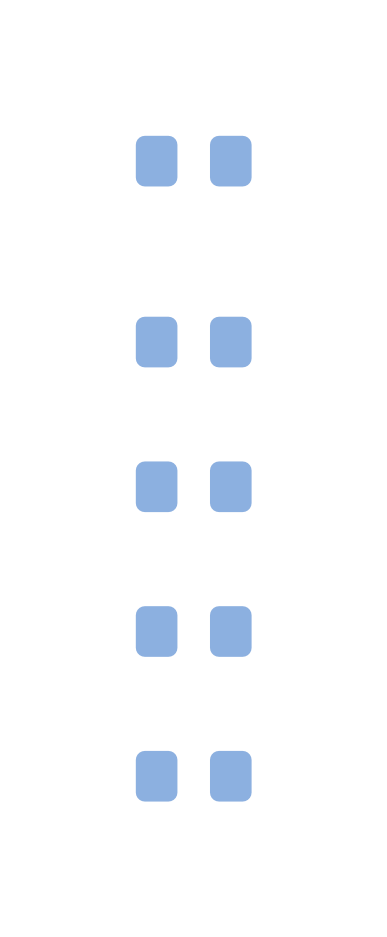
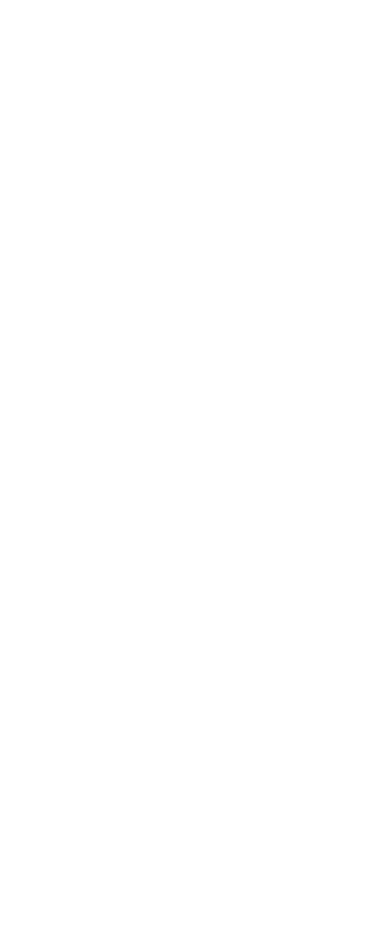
part: (193, 161) -> none
part: (193, 342) -> none
part: (193, 486) -> none
part: (193, 631) -> none
part: (193, 776) -> none

